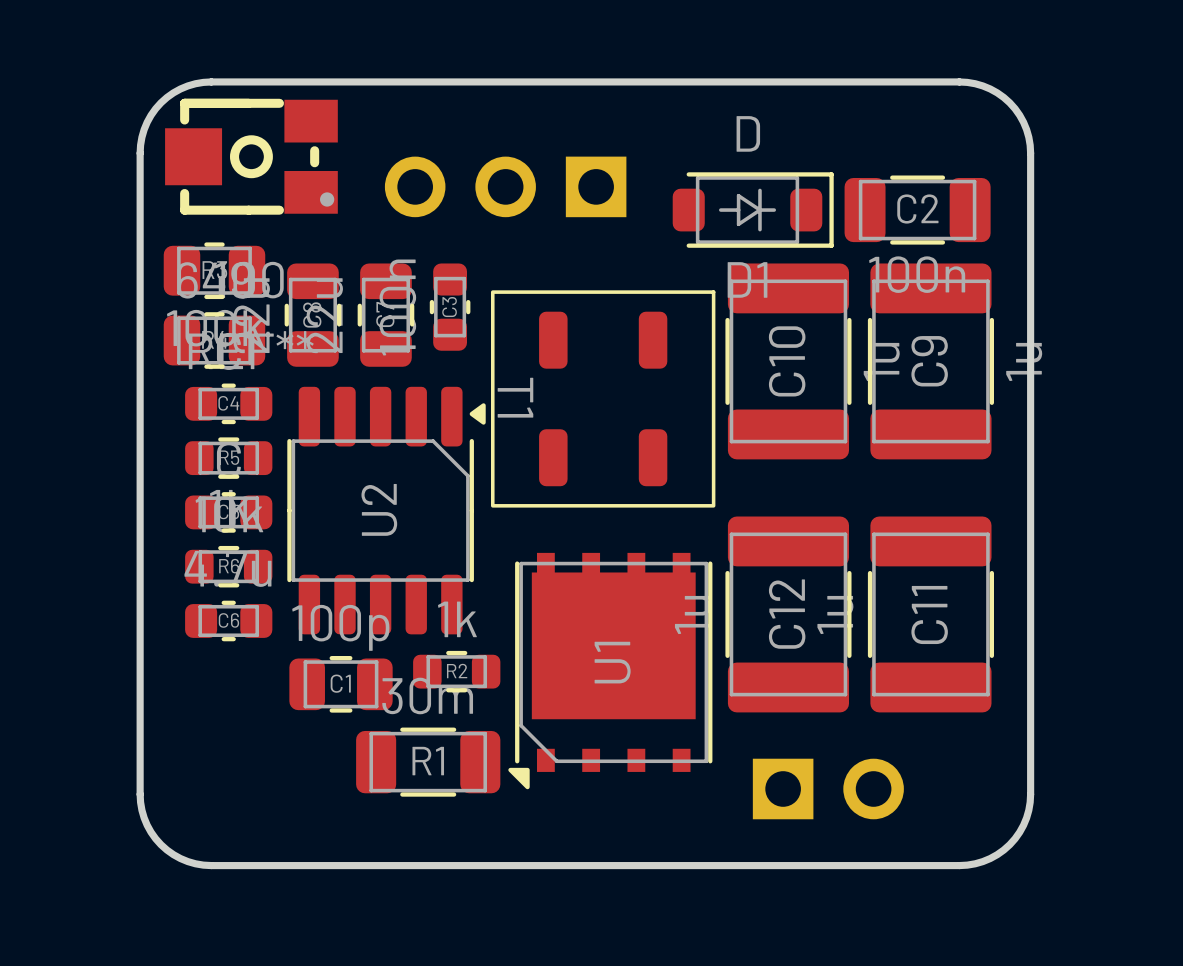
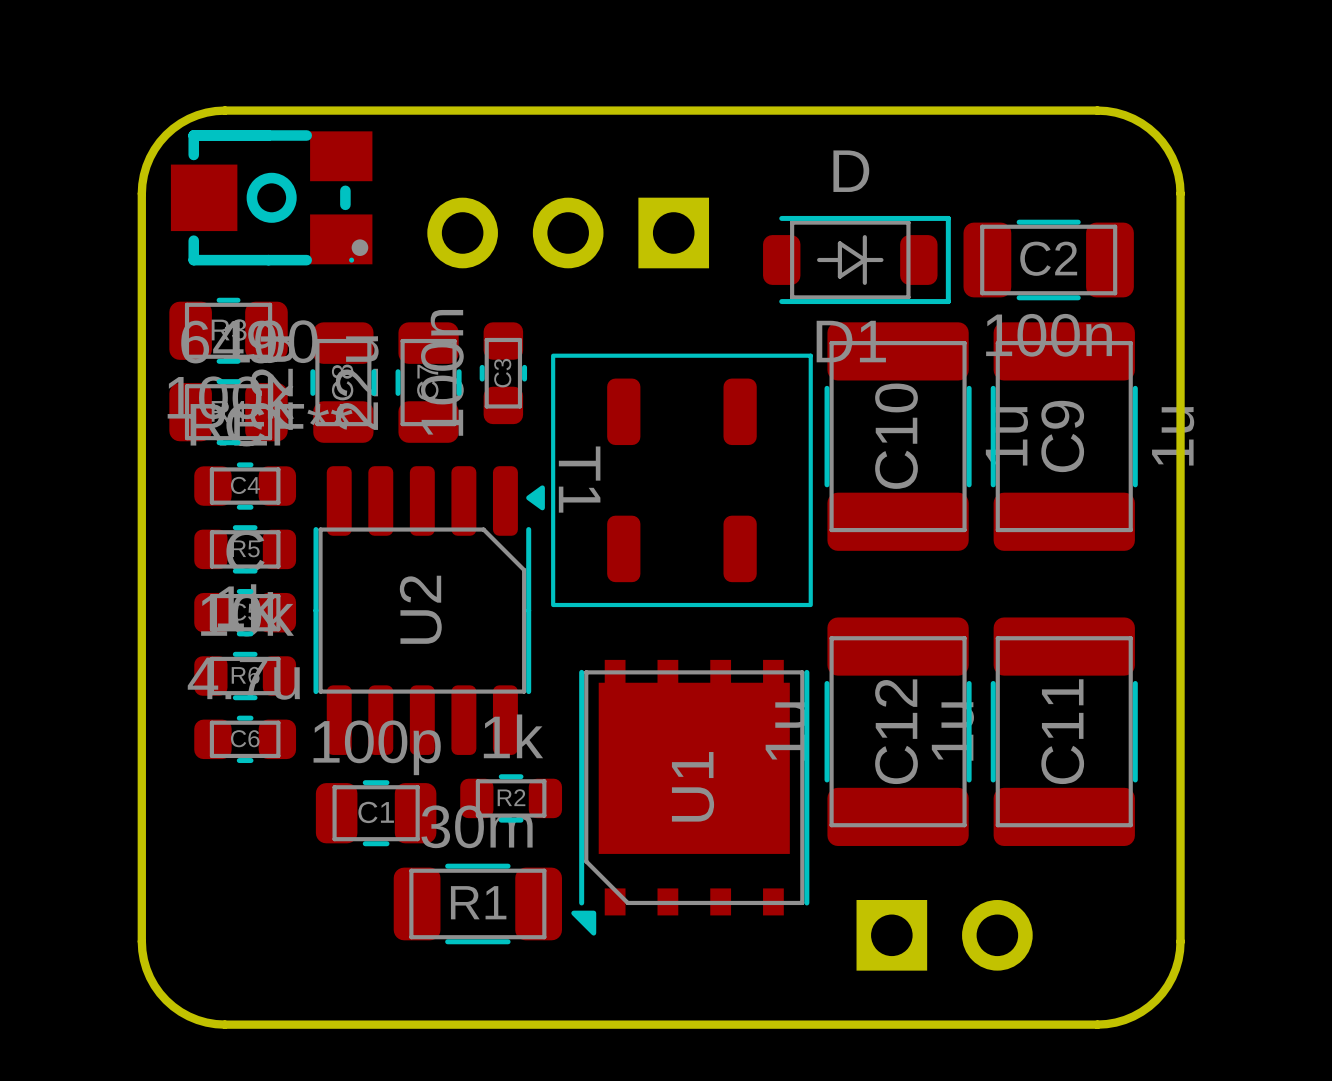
part footprint: [165, 98, 338, 215] -> [170, 130, 373, 266]

